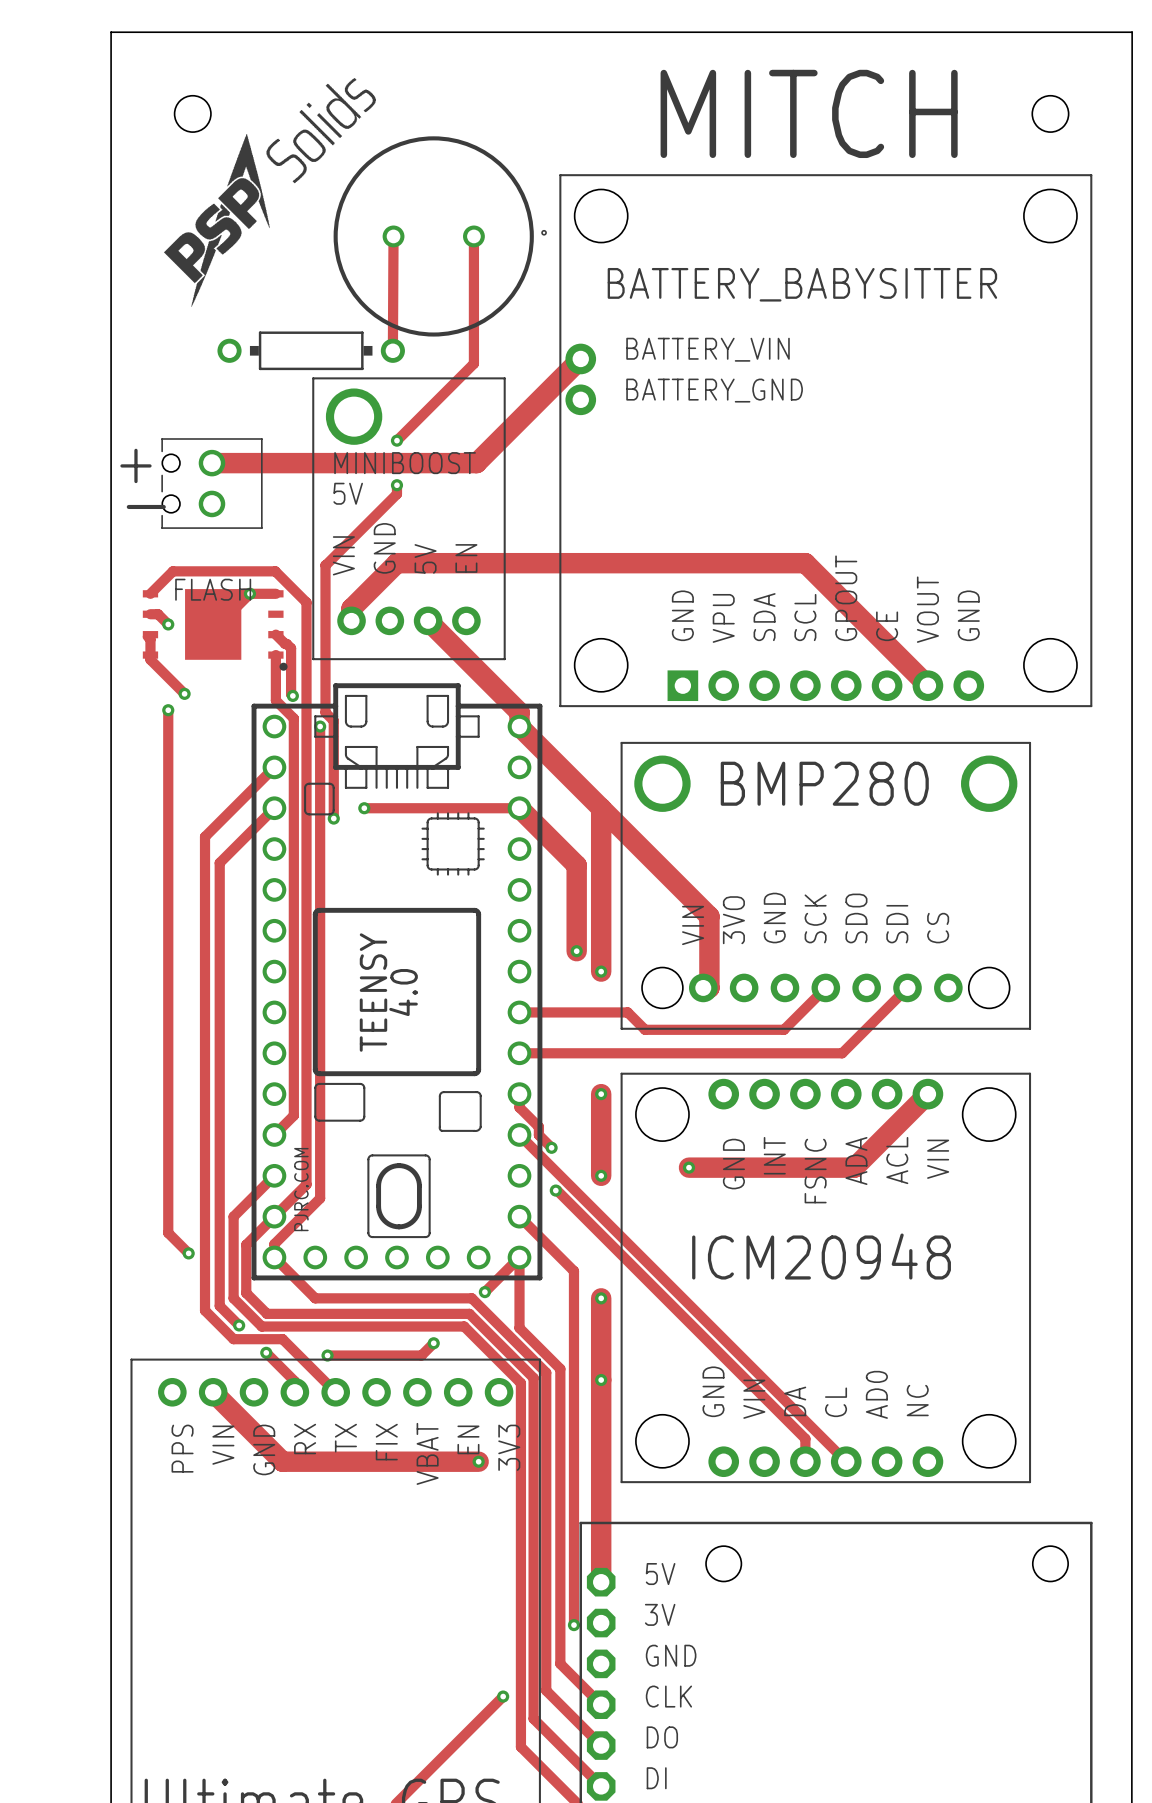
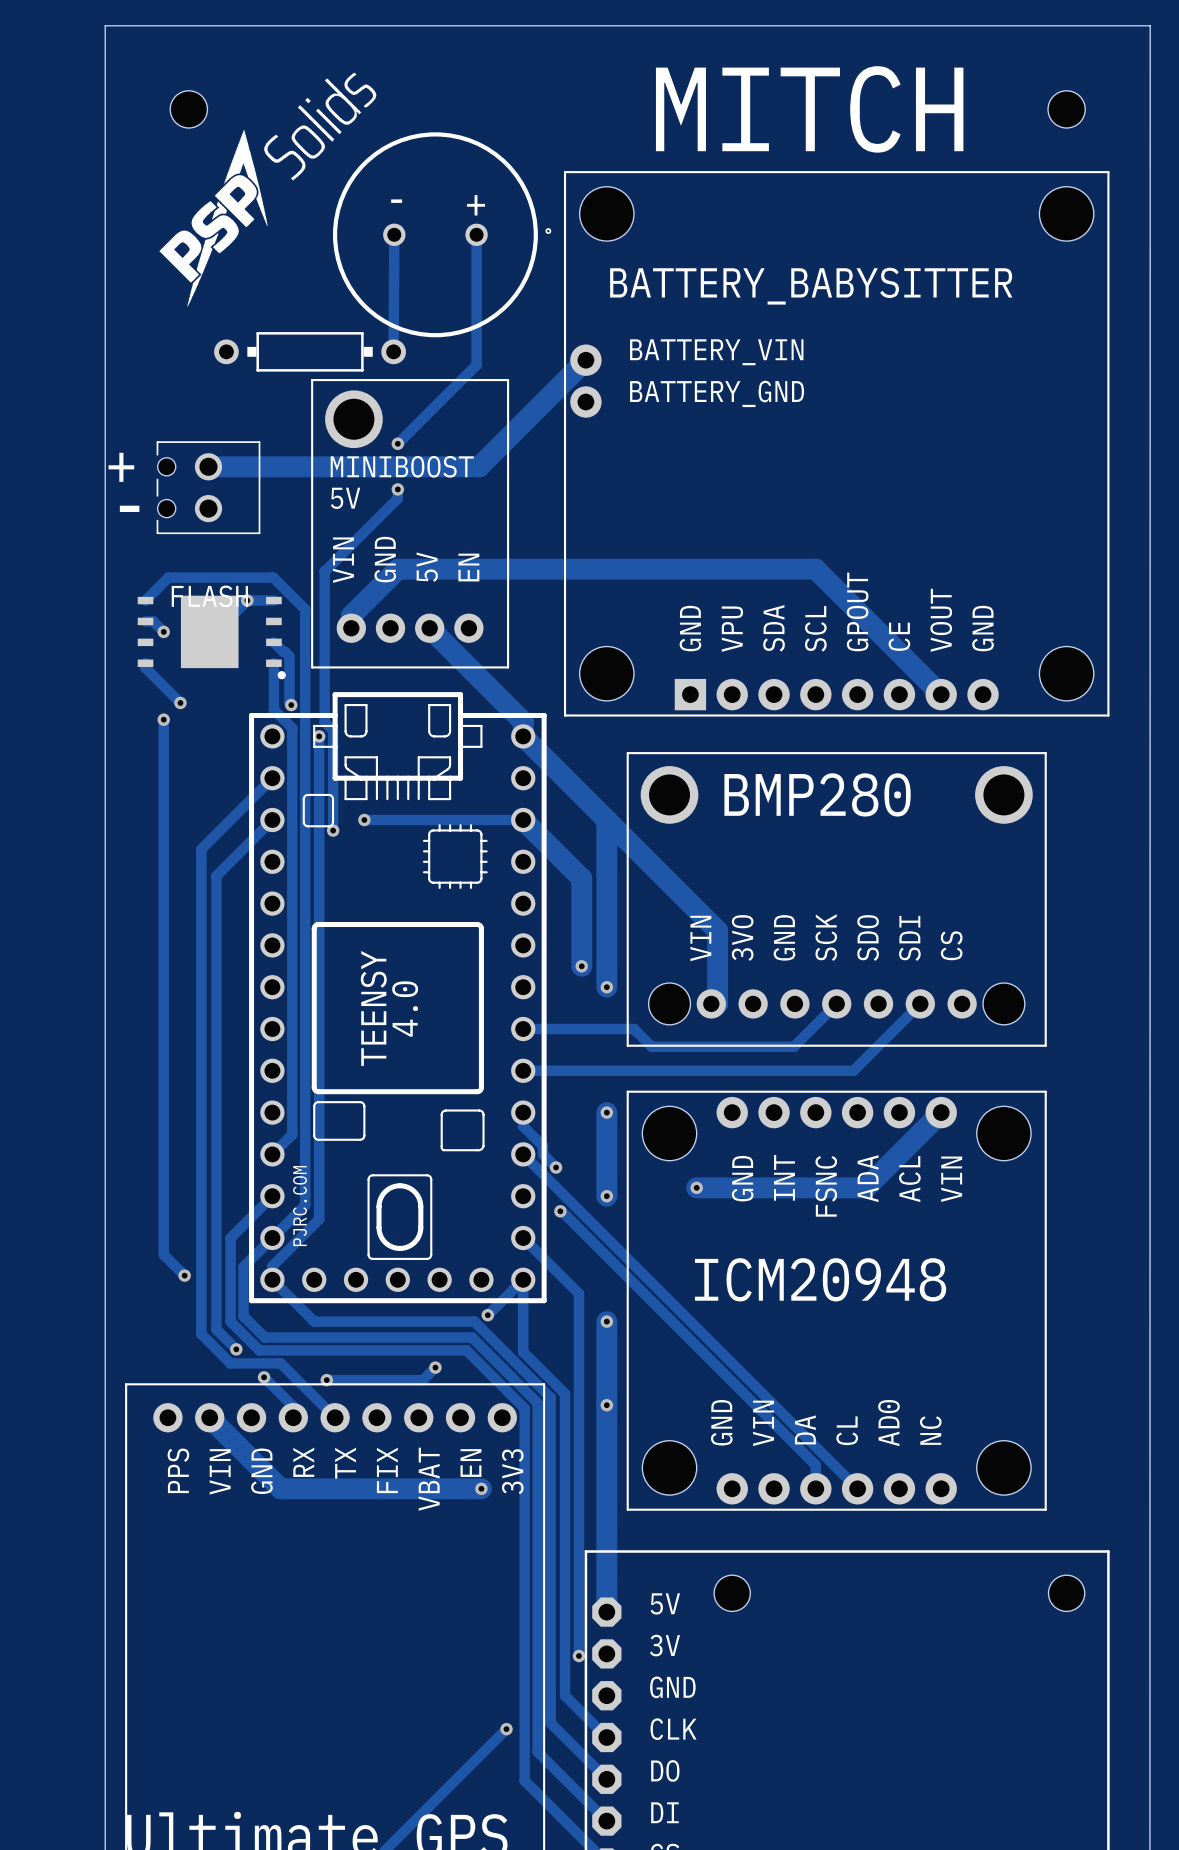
text: none -> - (396, 201)
text: none -> + (476, 205)
track: (147, 636) (150, 639) (150, 655) -> none

